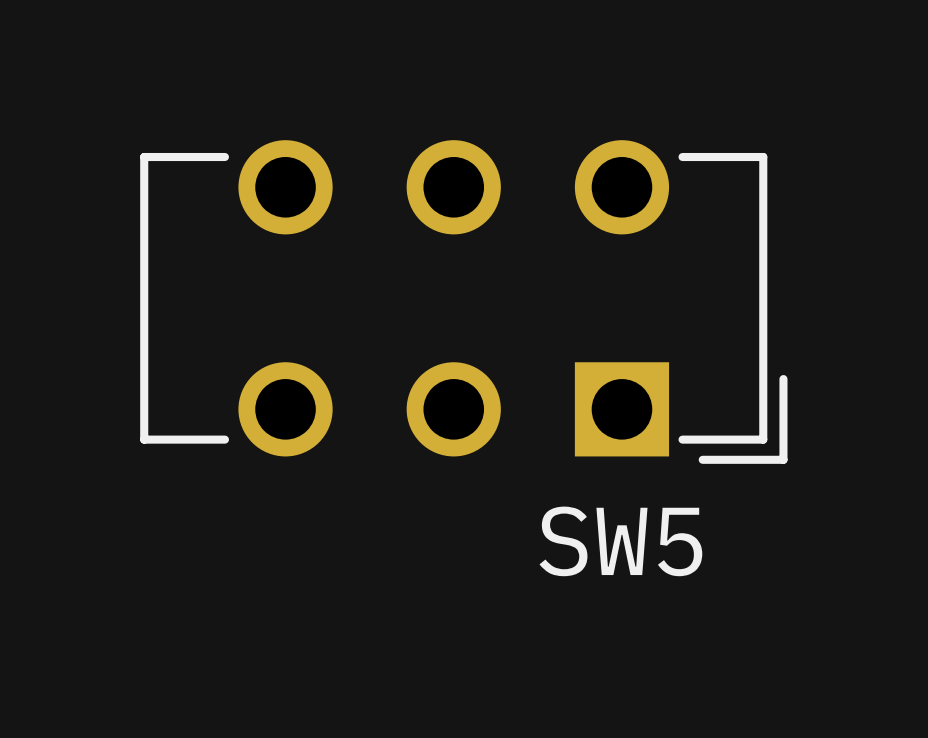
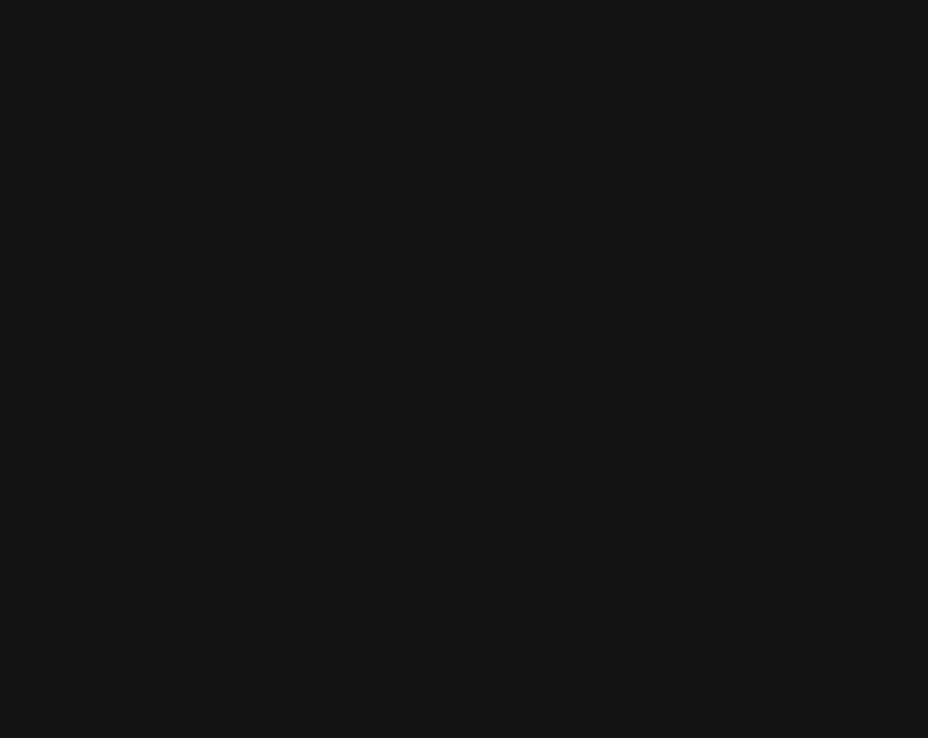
SW5: (463, 302) -> none

